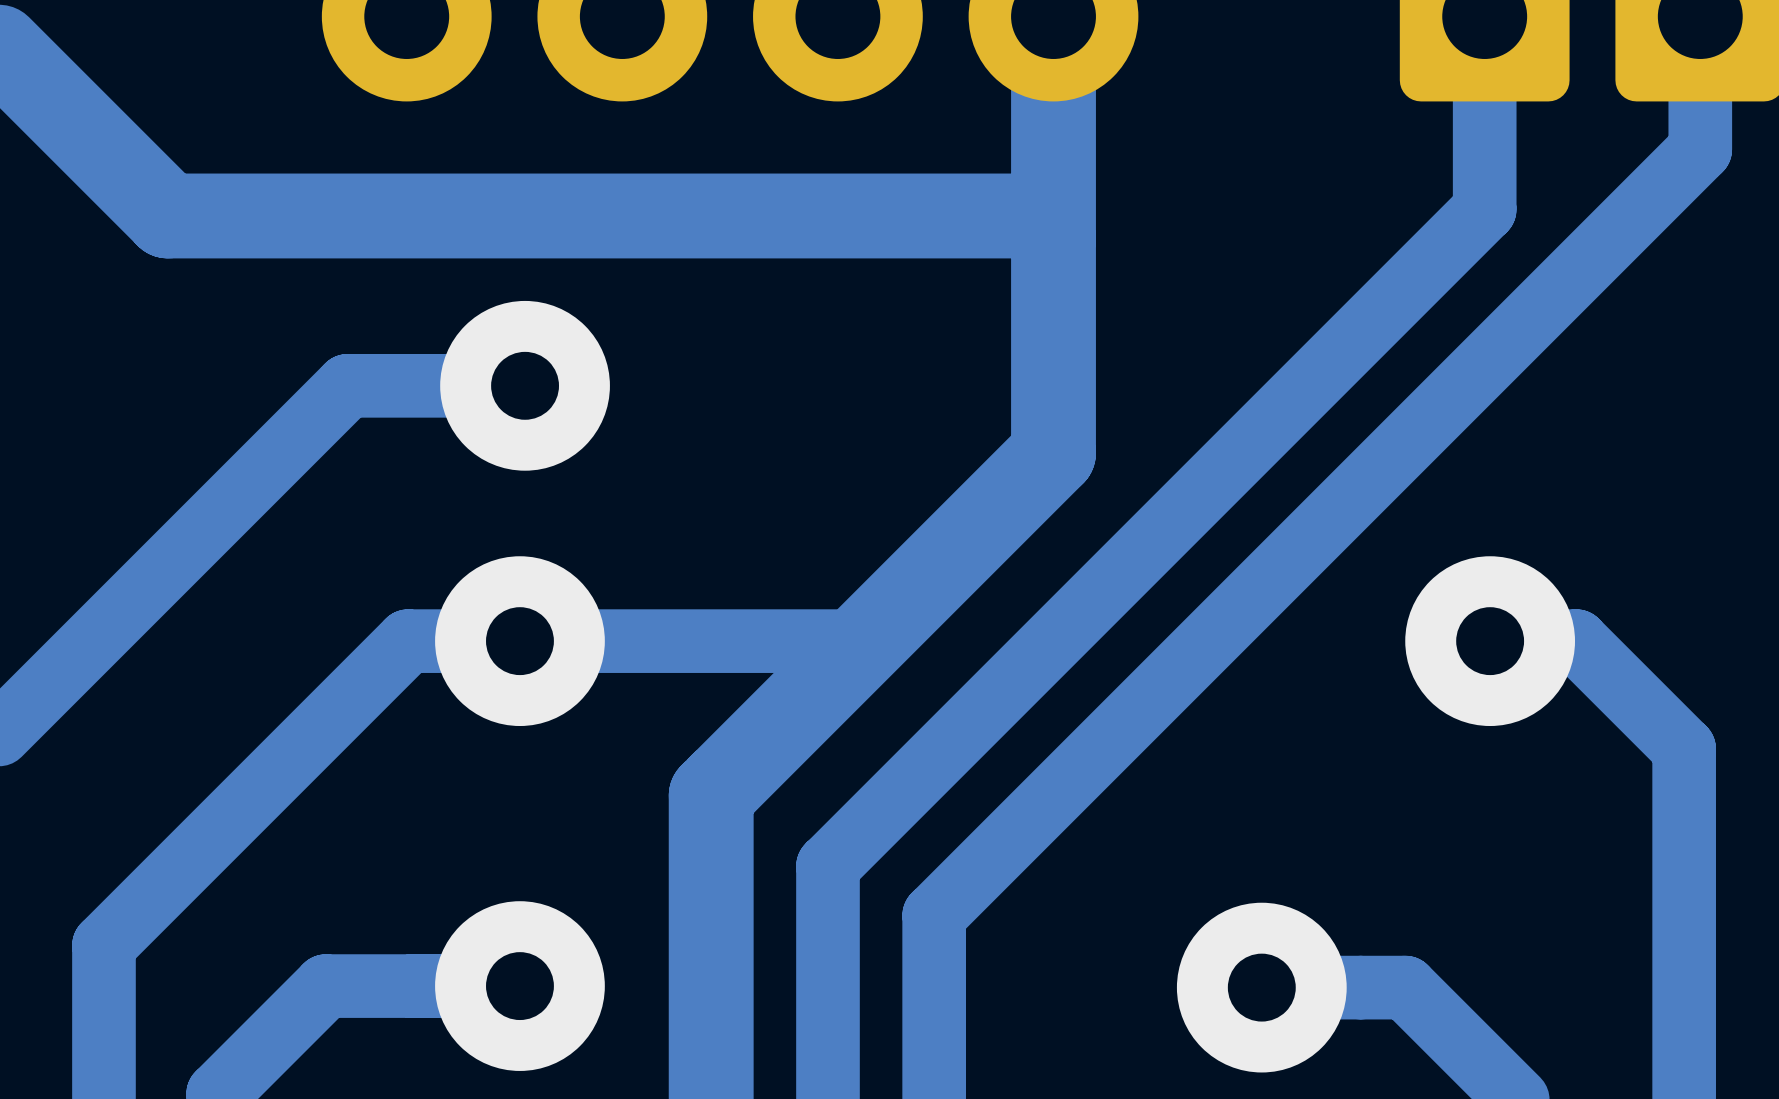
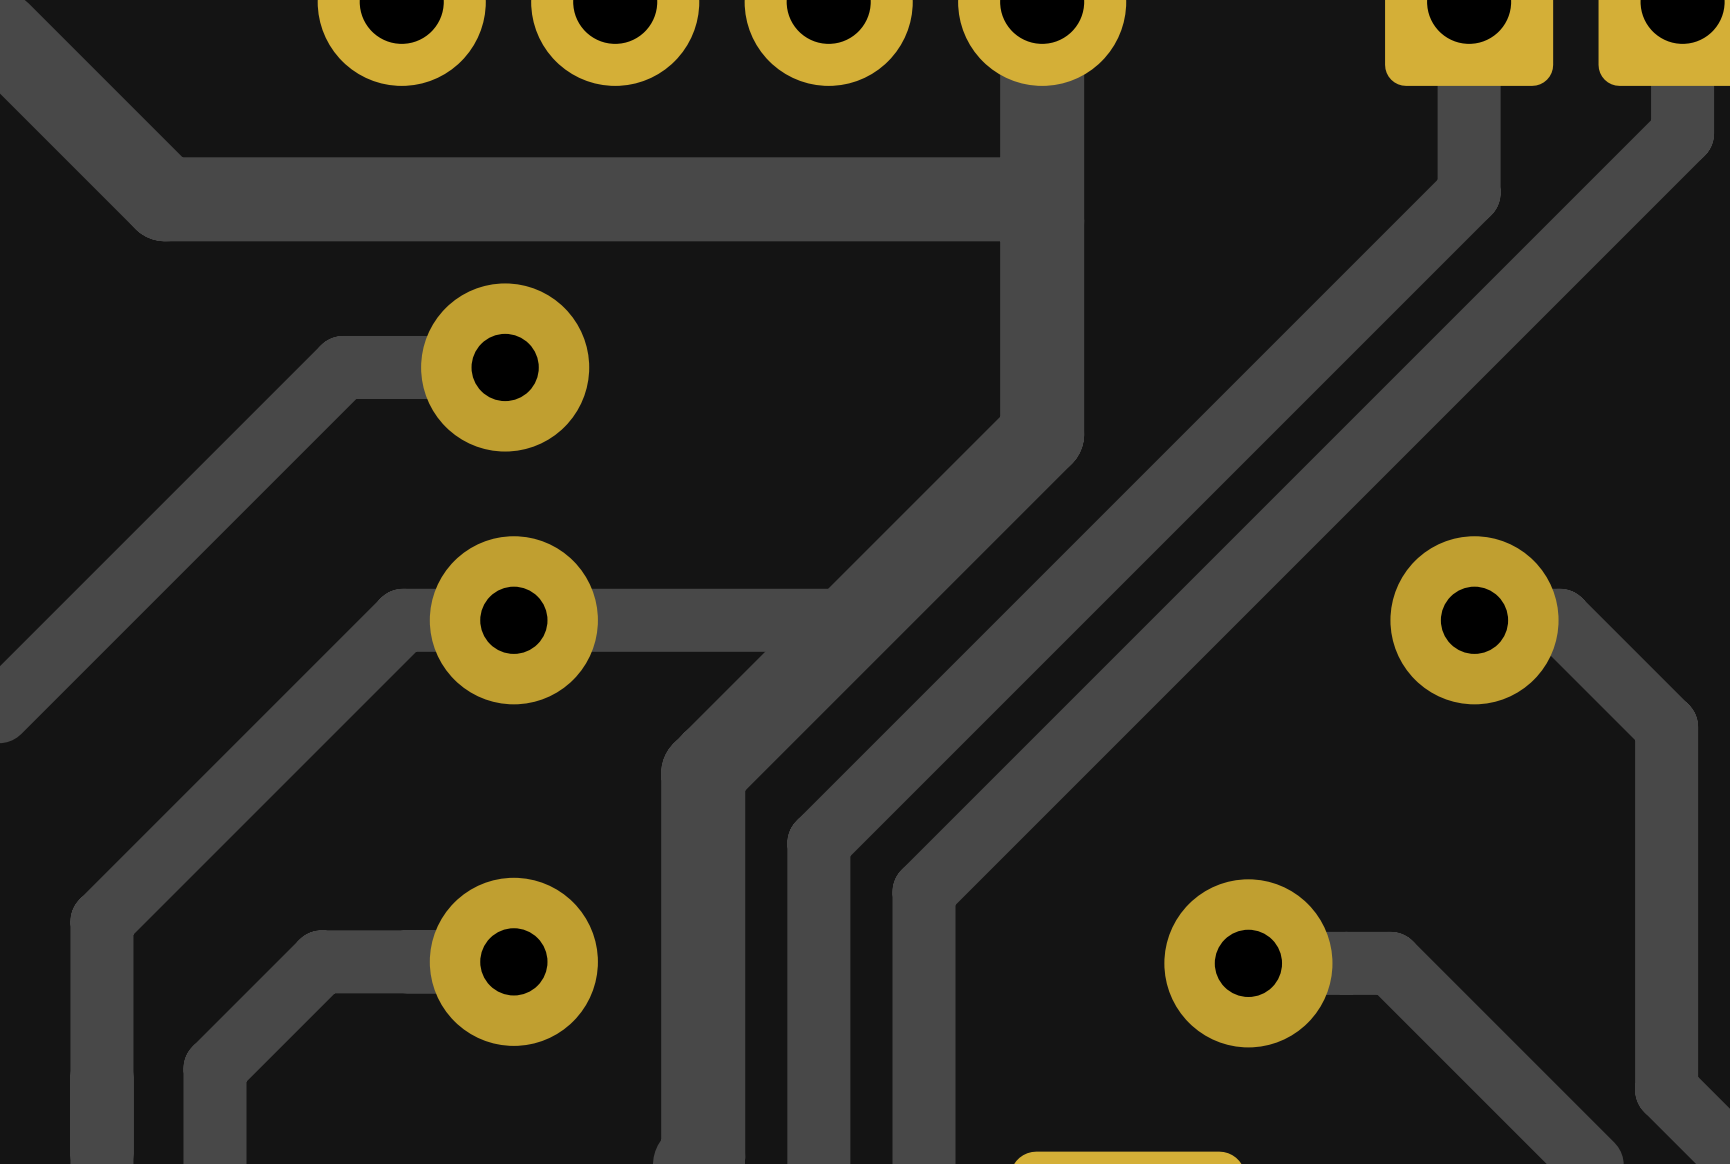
via position: (525, 385) -> (505, 367)

